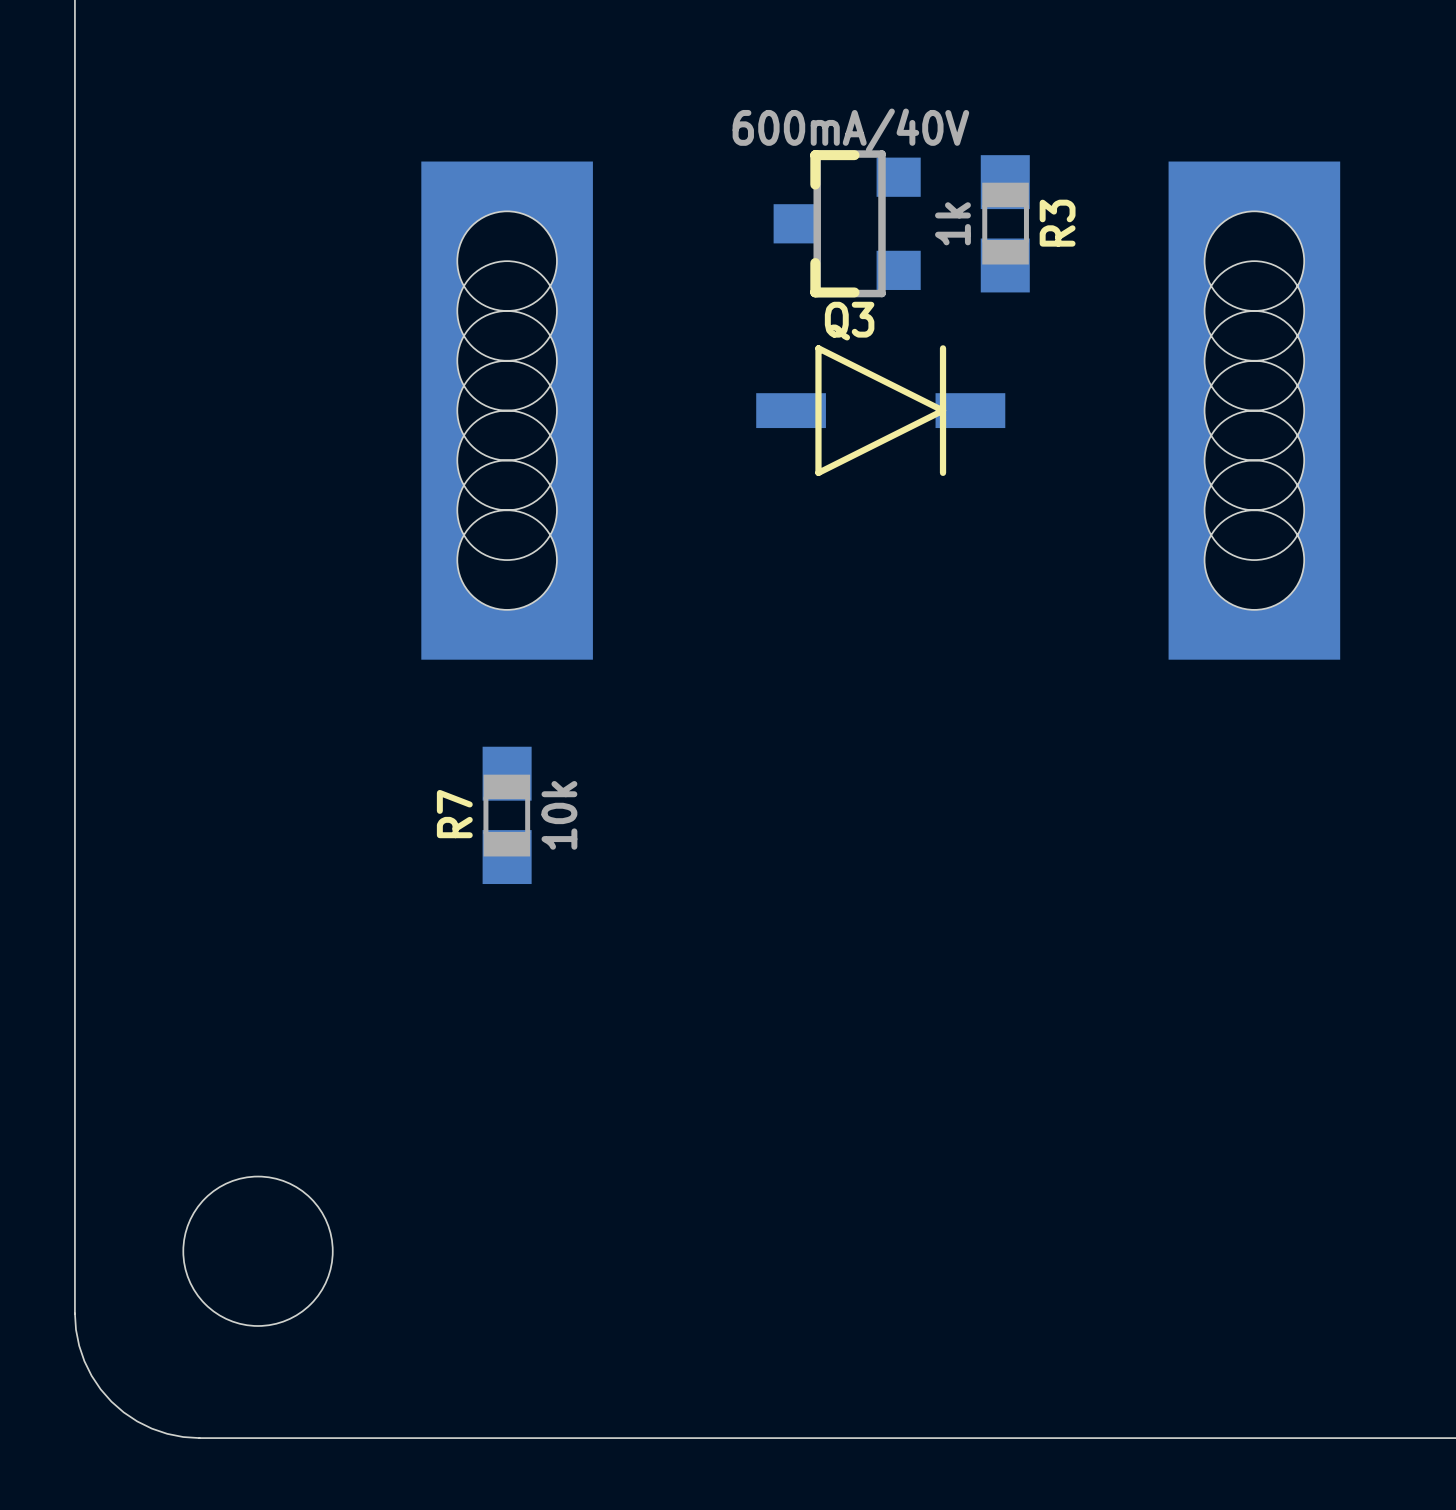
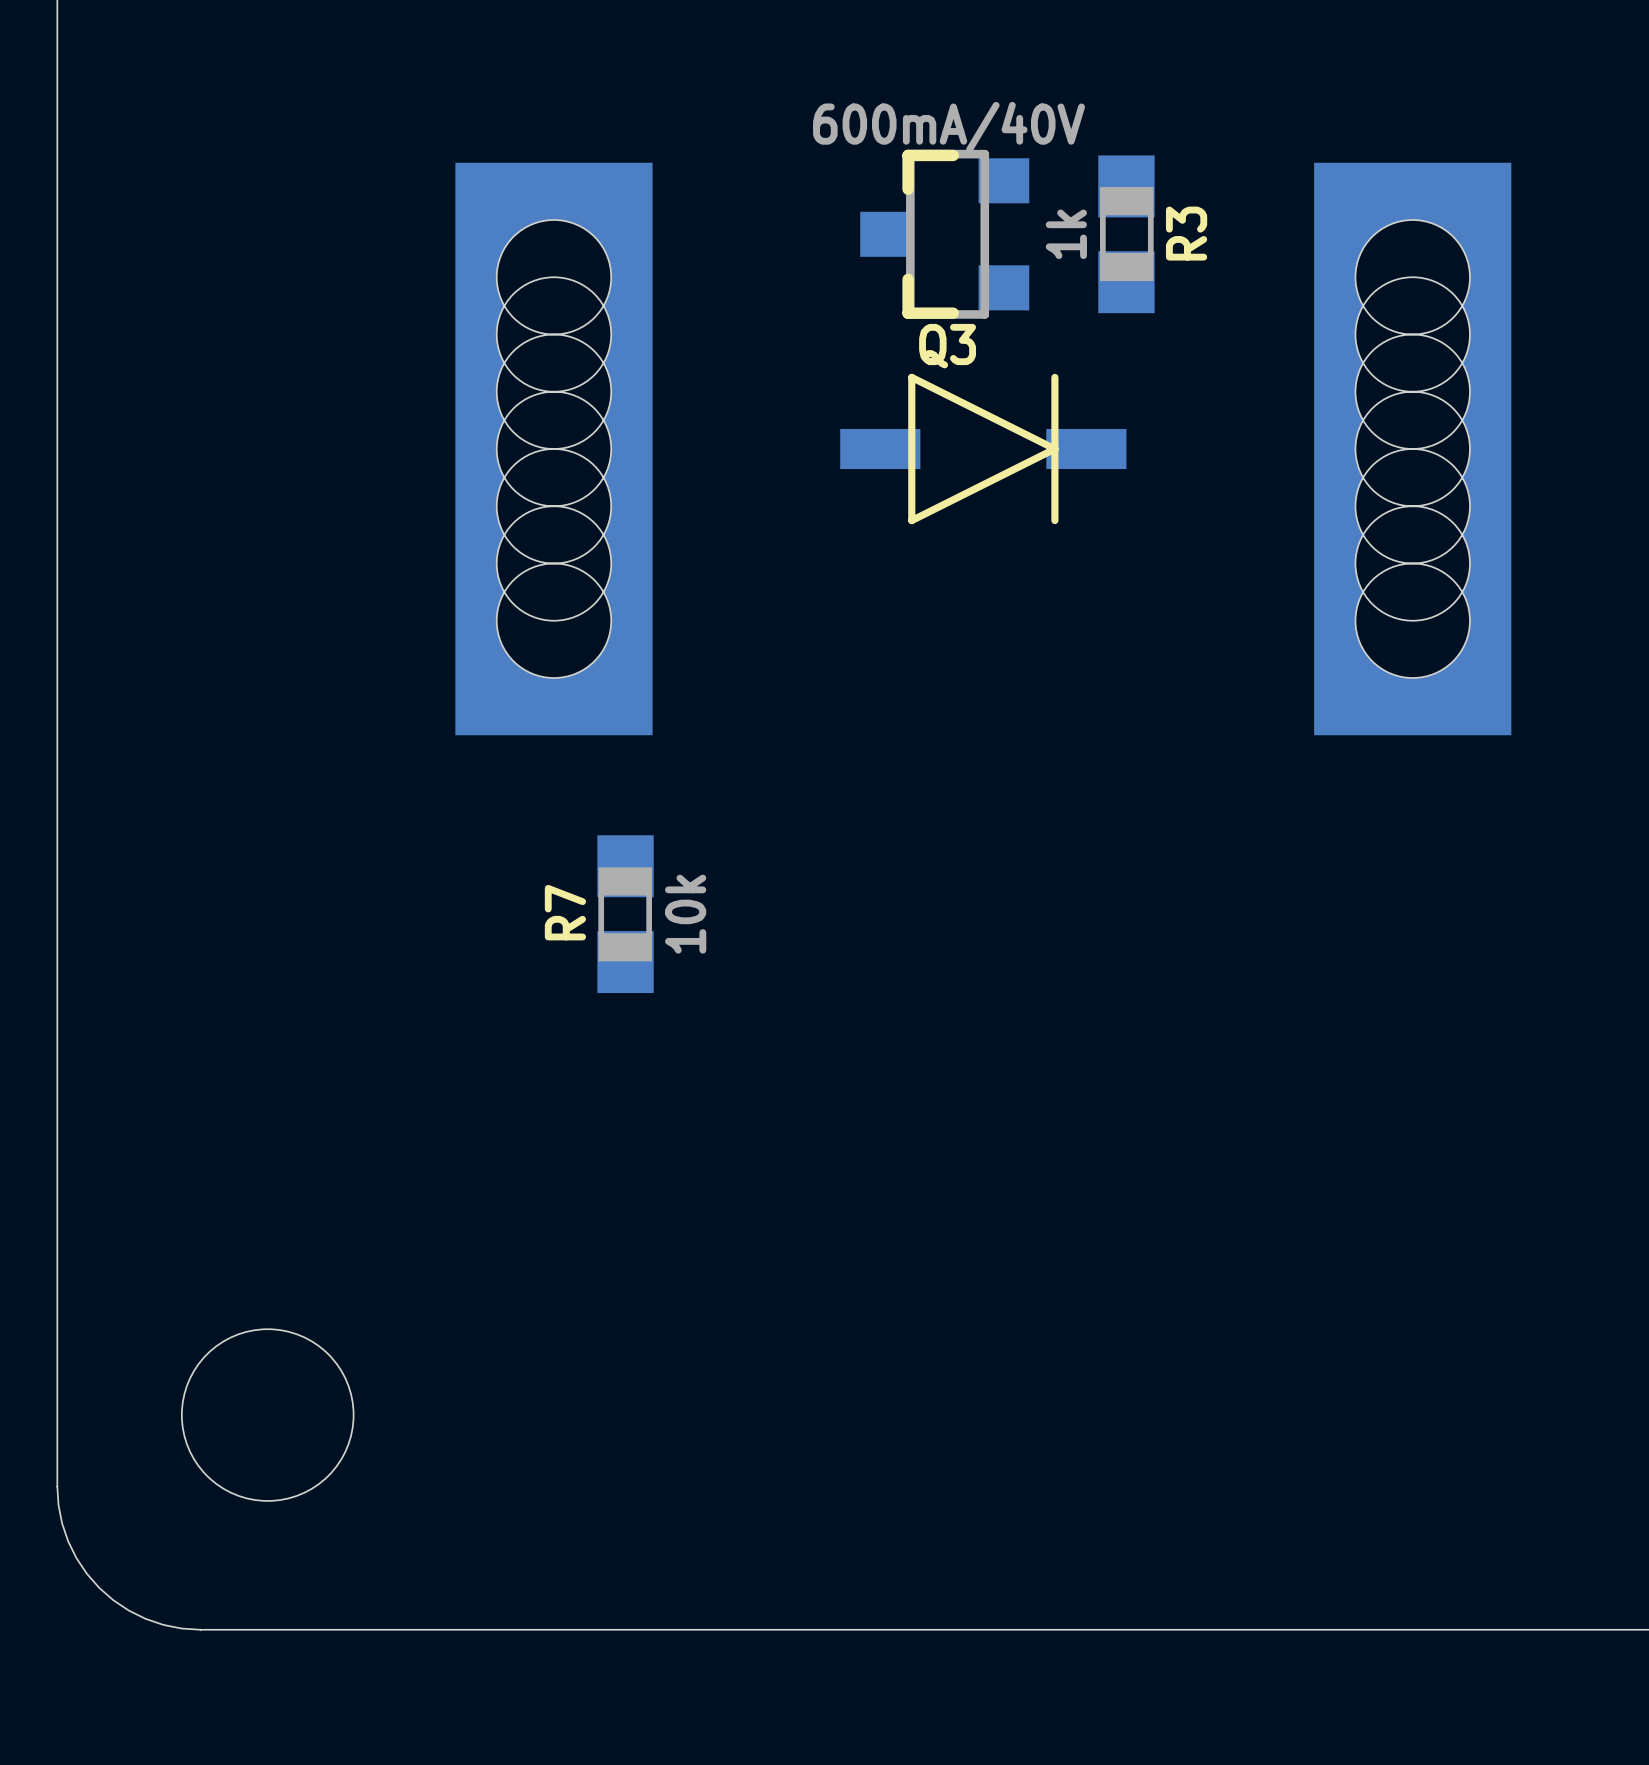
R7 position: (507, 815) -> (625, 914)

